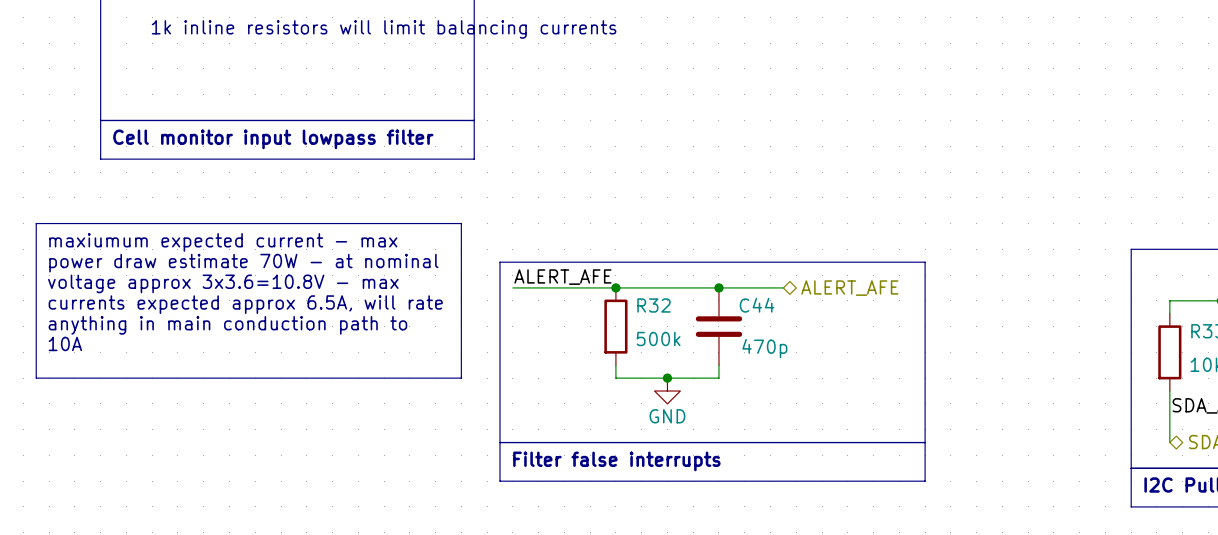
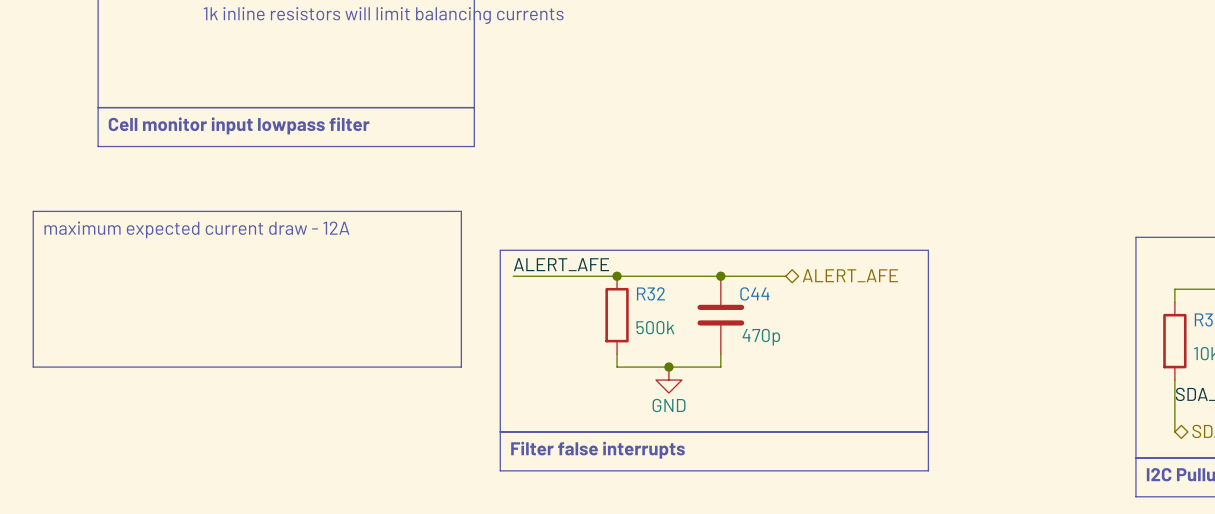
text: maxiumum expected current - max (223, 242) -> maximum expected current draw - 12A (196, 229)
text: power draw estimate 70W - at nominal (243, 263) -> none
text: voltage approx 3x3.6=10.8V - max (223, 283) -> none
text: currents expected approx 6.5A, will rate (245, 304) -> none
text: anything in main conduction path to (227, 325) -> none
text: 10A (65, 343) -> none

